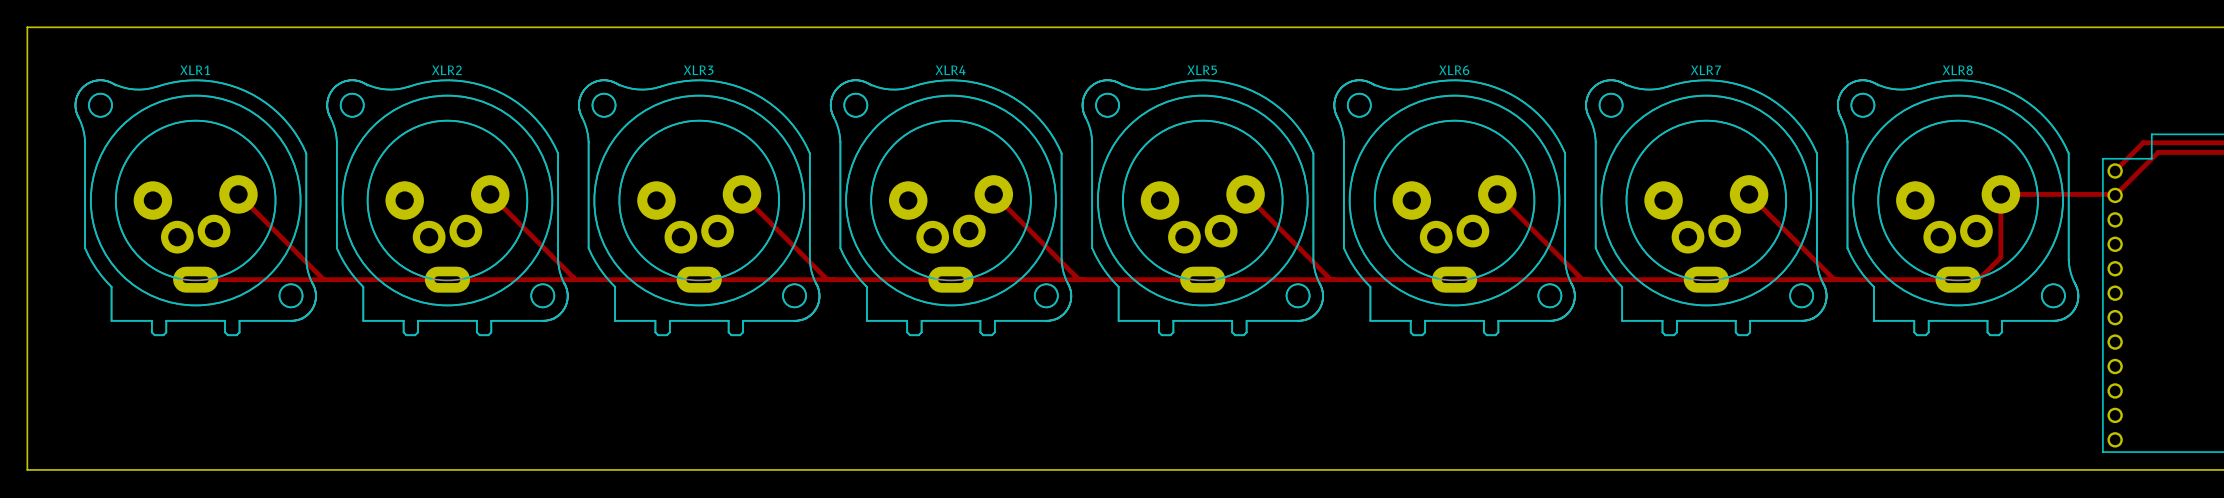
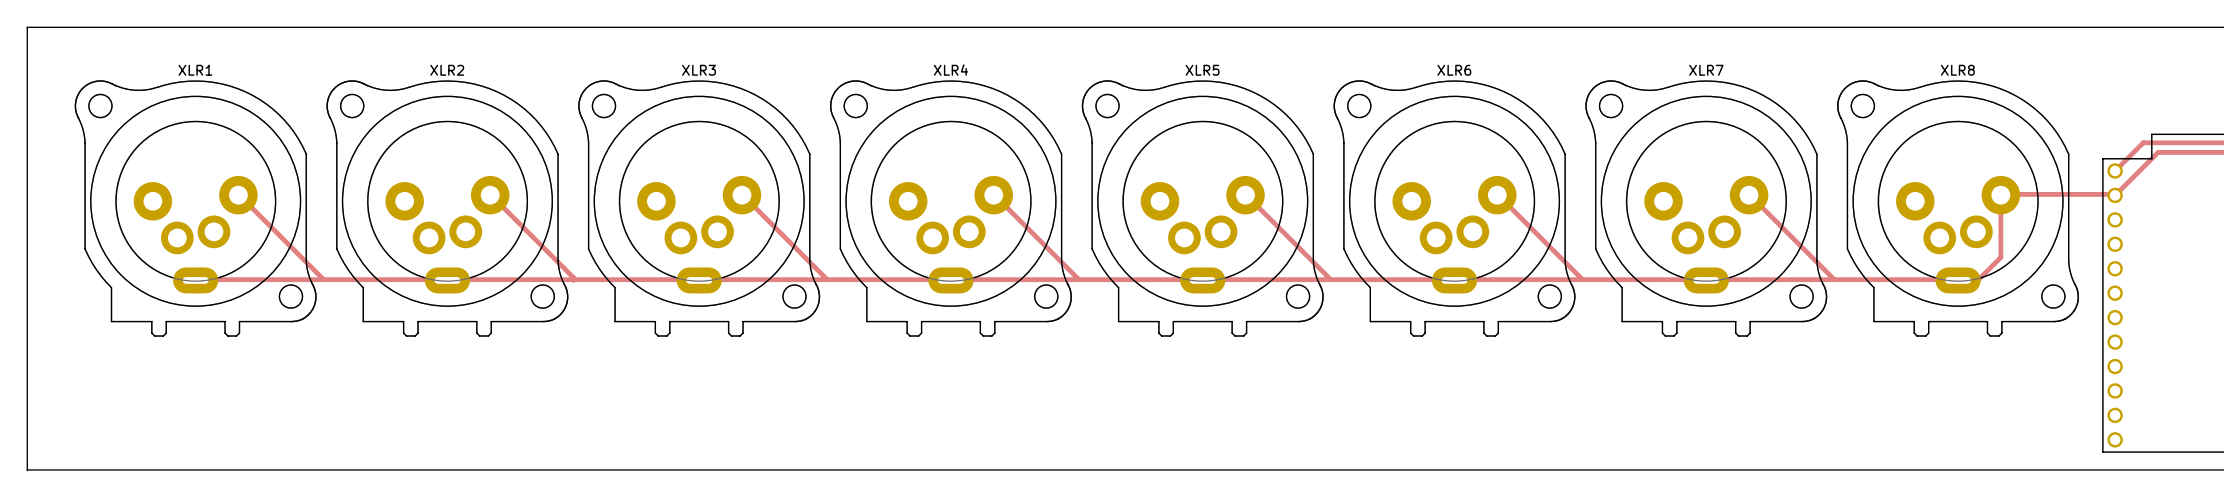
XLR1 footprint: [74, 79, 317, 336] -> [74, 80, 317, 337]
XLR2 footprint: [326, 79, 569, 336] -> [326, 80, 569, 337]
XLR3 footprint: [578, 79, 821, 336] -> [578, 80, 821, 337]
XLR4 footprint: [830, 79, 1072, 336] -> [830, 80, 1072, 337]
XLR5 footprint: [1081, 79, 1324, 336] -> [1081, 80, 1324, 337]
XLR6 footprint: [1333, 79, 1576, 336] -> [1333, 80, 1576, 337]
XLR7 footprint: [1585, 79, 1828, 336] -> [1585, 80, 1828, 337]
XLR8 footprint: [1837, 79, 2079, 336] -> [1837, 80, 2079, 337]

